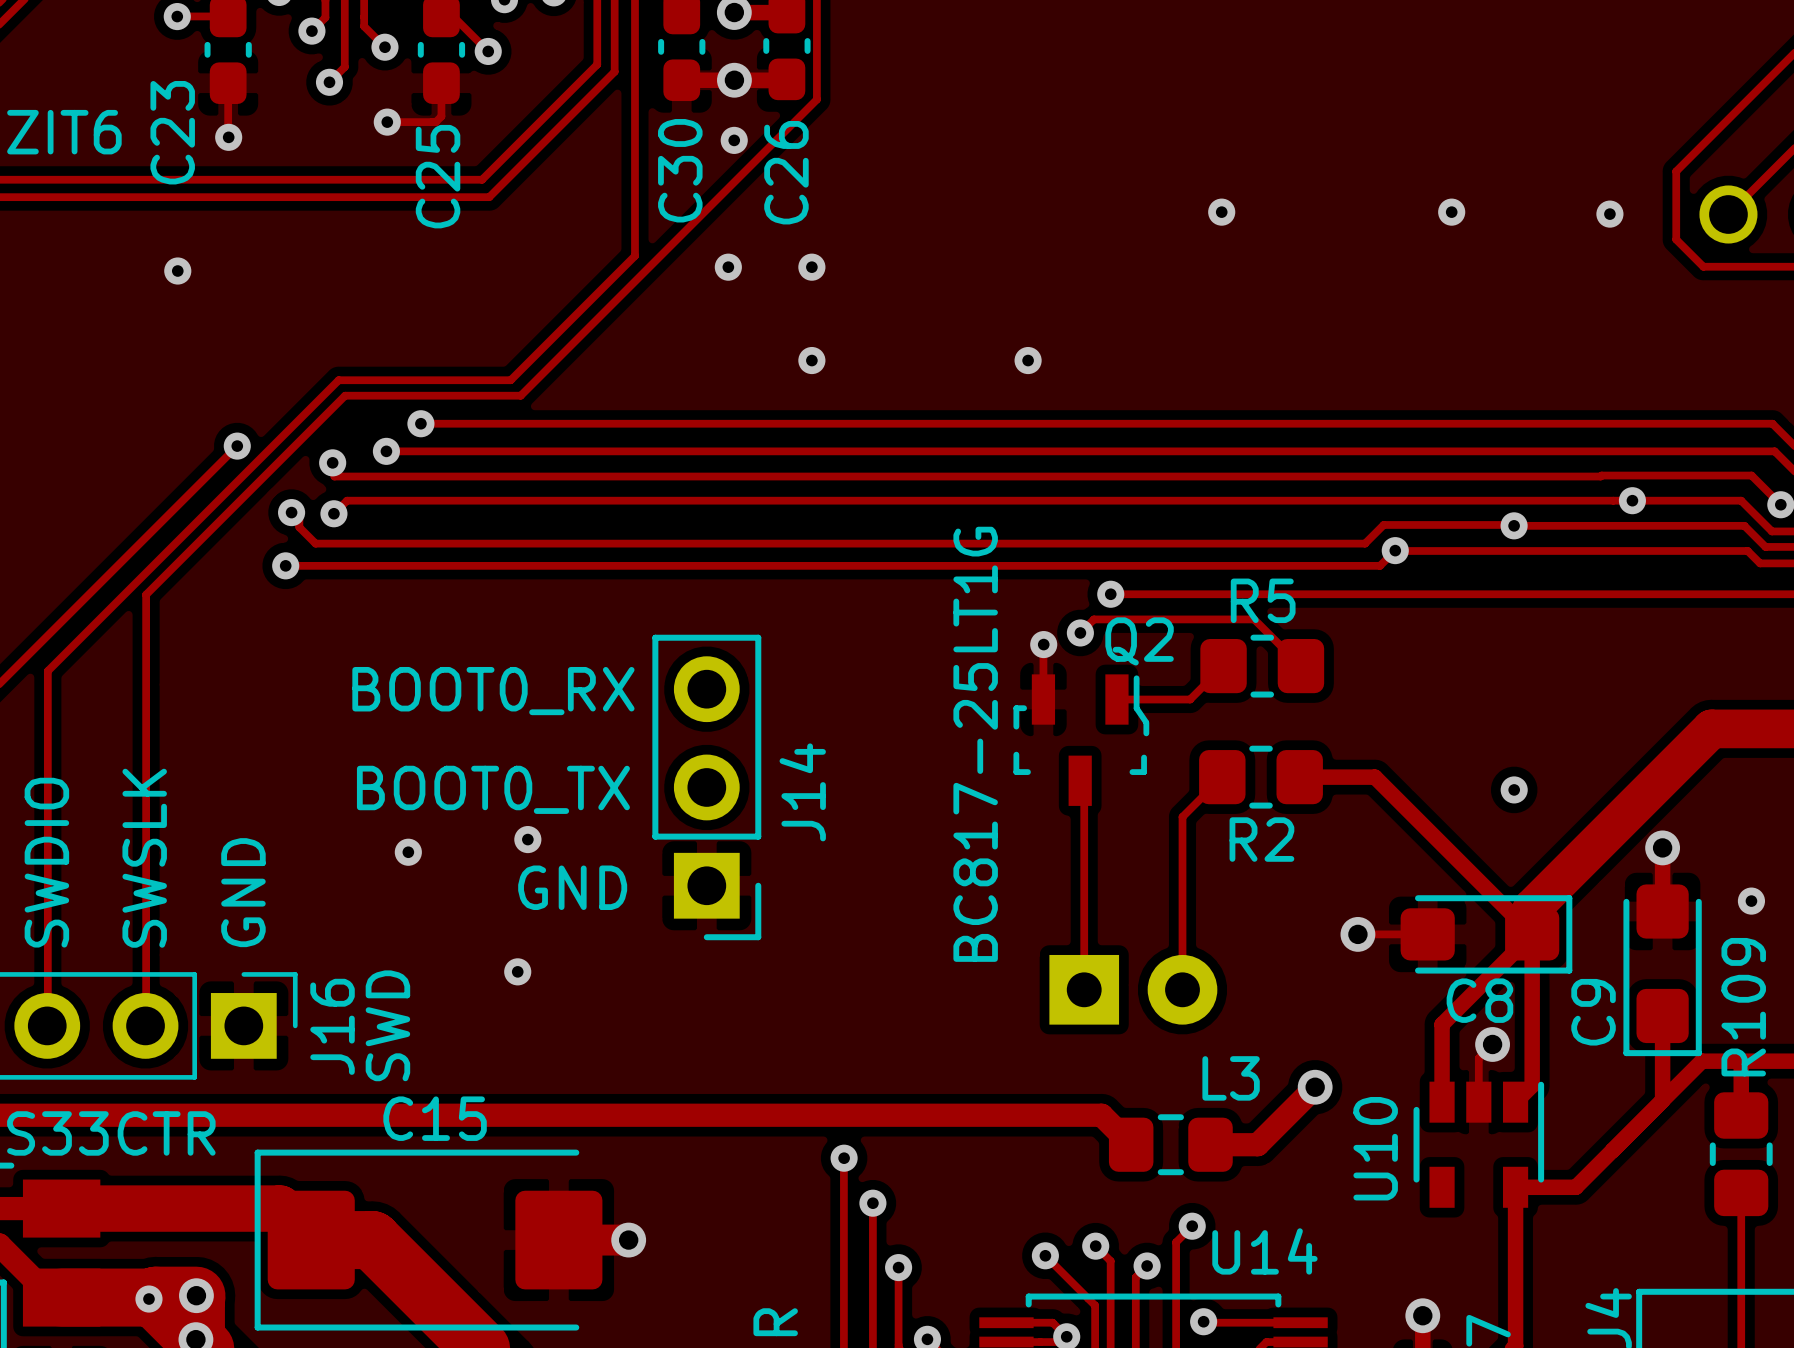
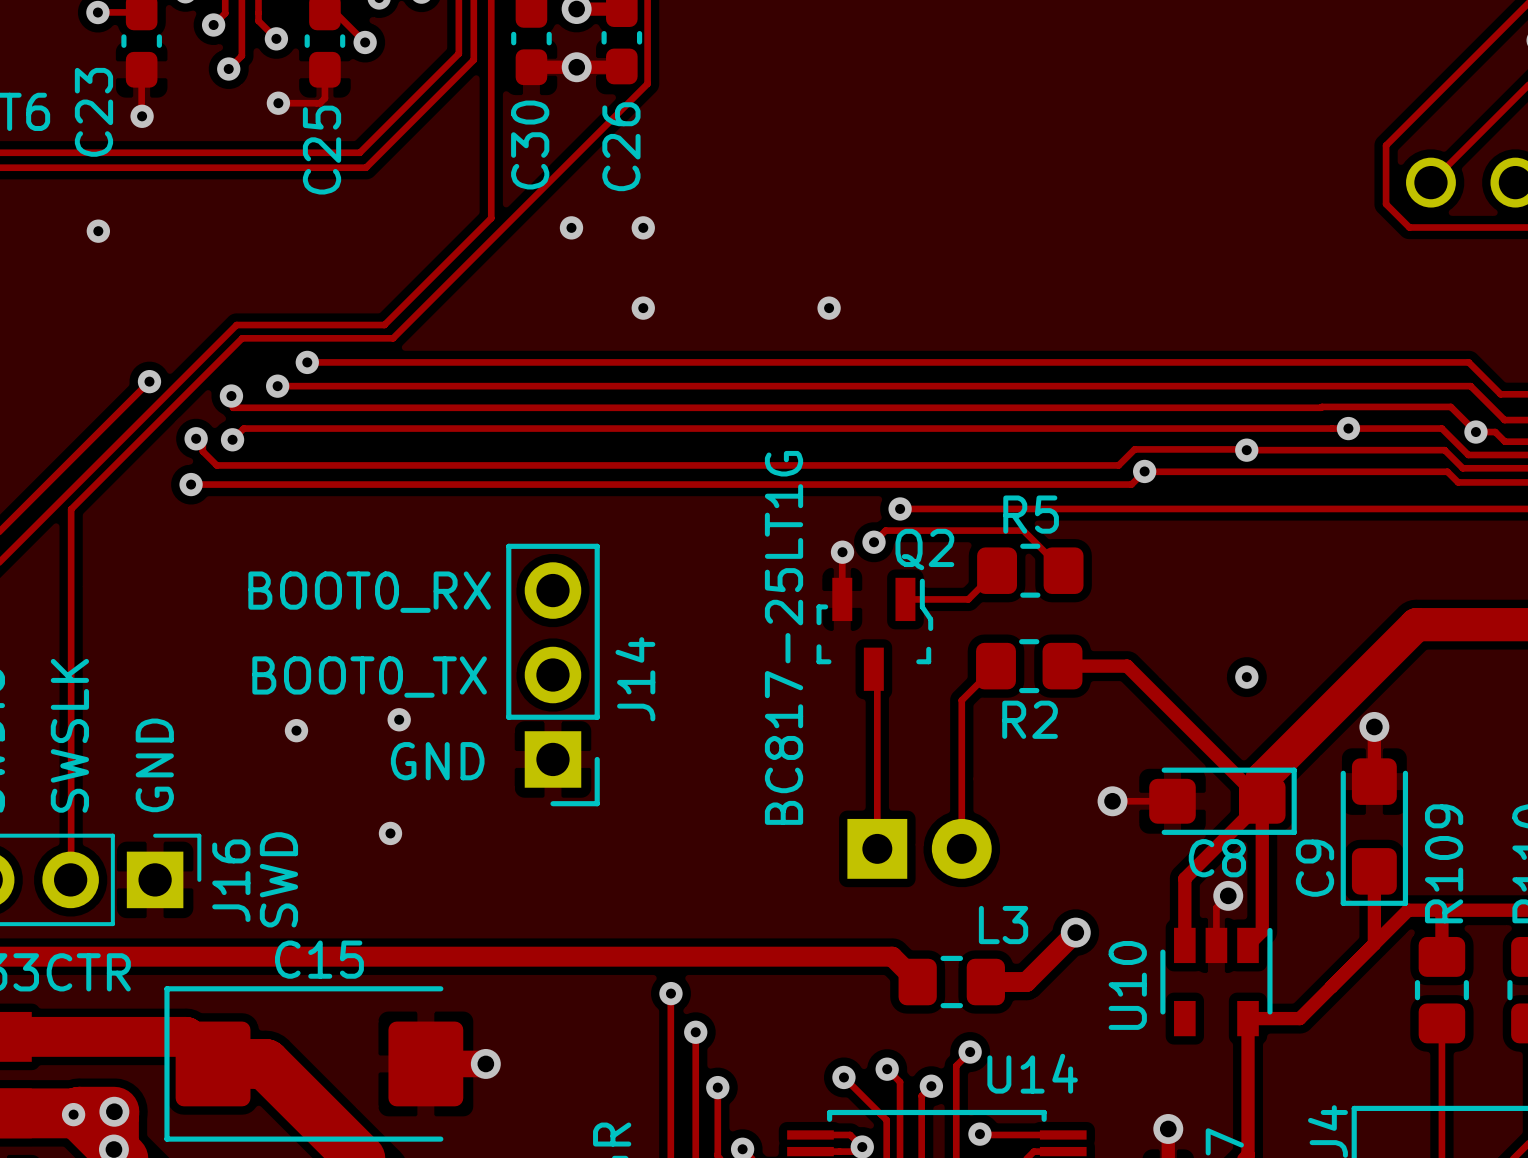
via: (734, 140) -> none
via: (1221, 212) -> none
via: (1451, 212) -> none
via: (1609, 214) -> none
via: (1751, 901) -> none

